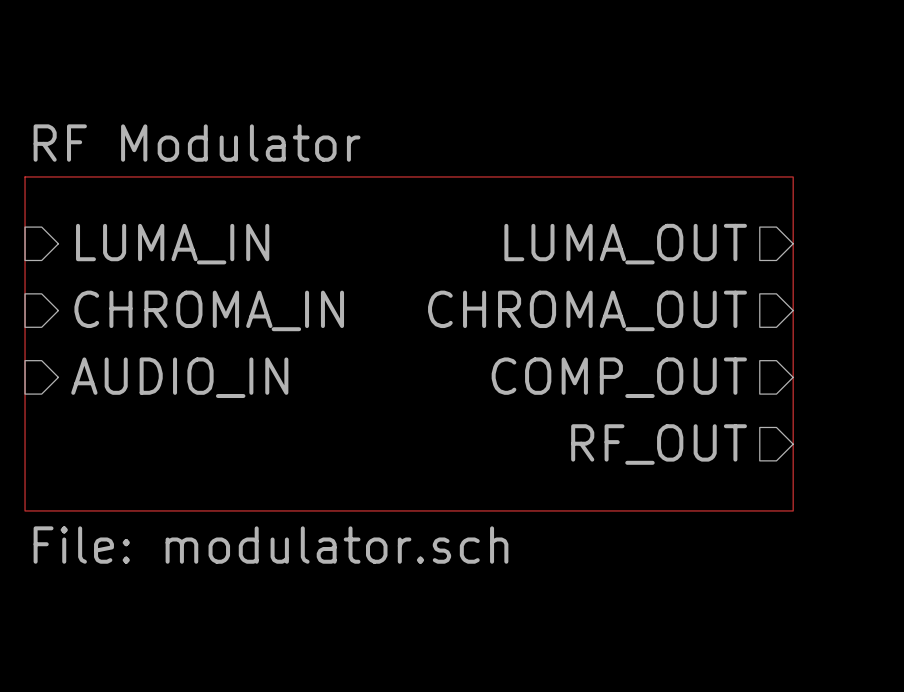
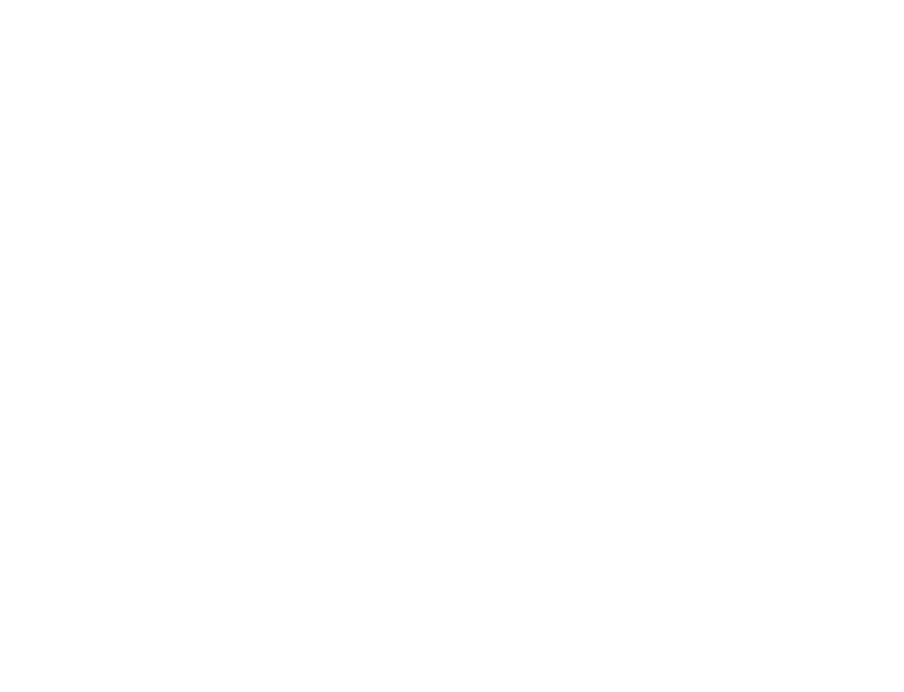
sheet pin: LUMA_IN (172, 244) -> none
sheet pin: LUMA_OUT (625, 244) -> none
sheet pin: CHROMA_IN (209, 310) -> none
sheet pin: CHROMA_OUT (587, 310) -> none
sheet RF Modulator: File: modulator.sch (409, 343) -> none
sheet pin: AUDIO_IN (179, 377) -> none
sheet pin: COMP_OUT (619, 377) -> none
sheet pin: RF_OUT (659, 444) -> none

